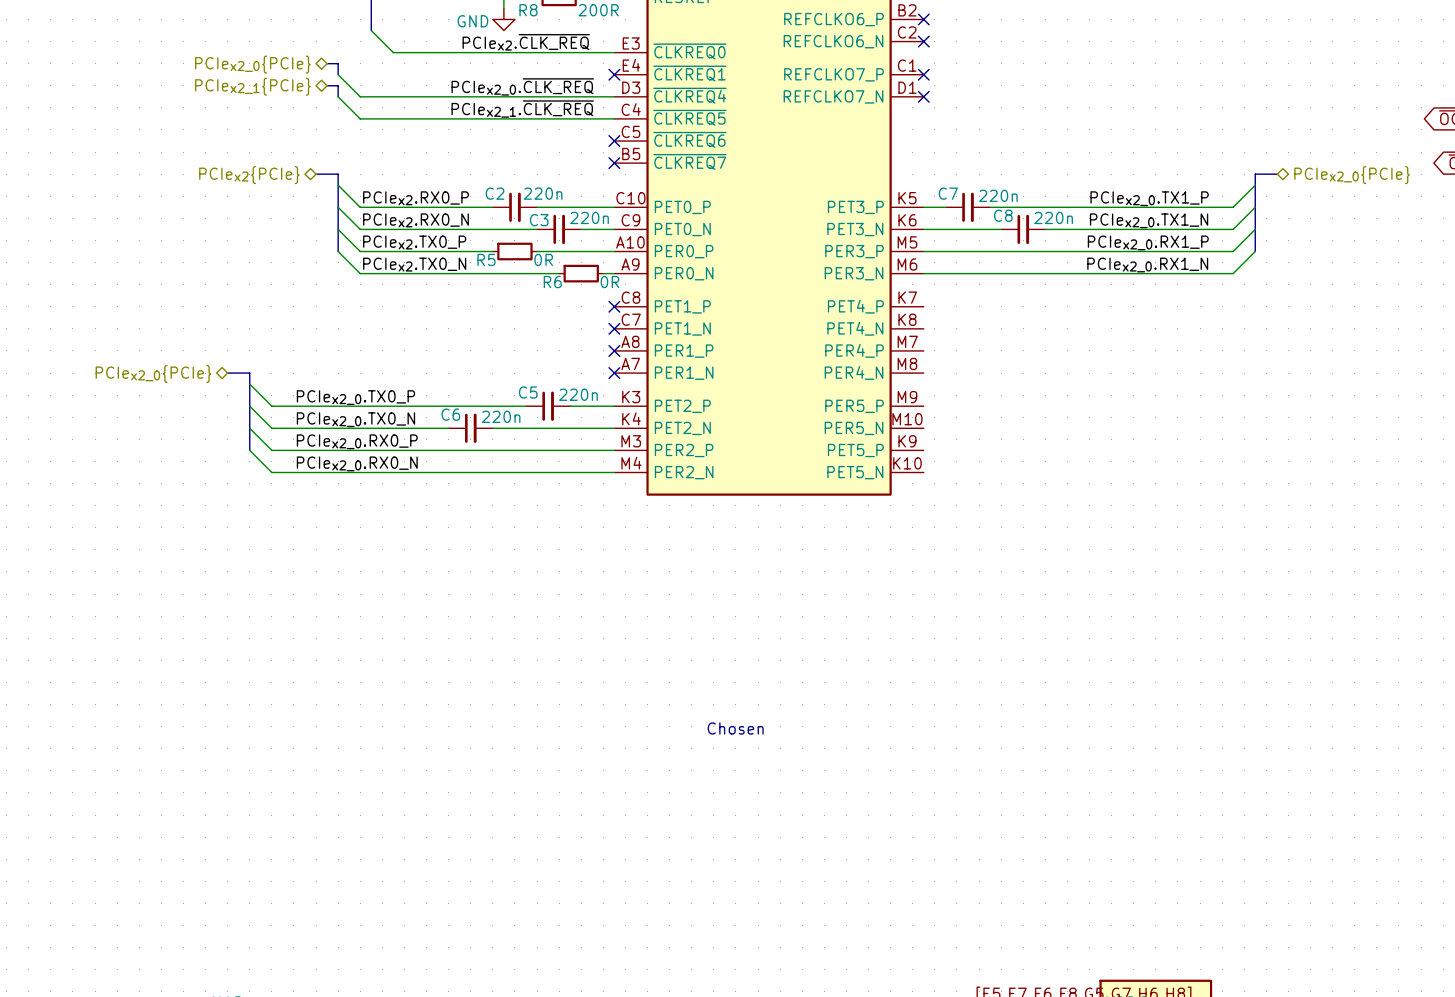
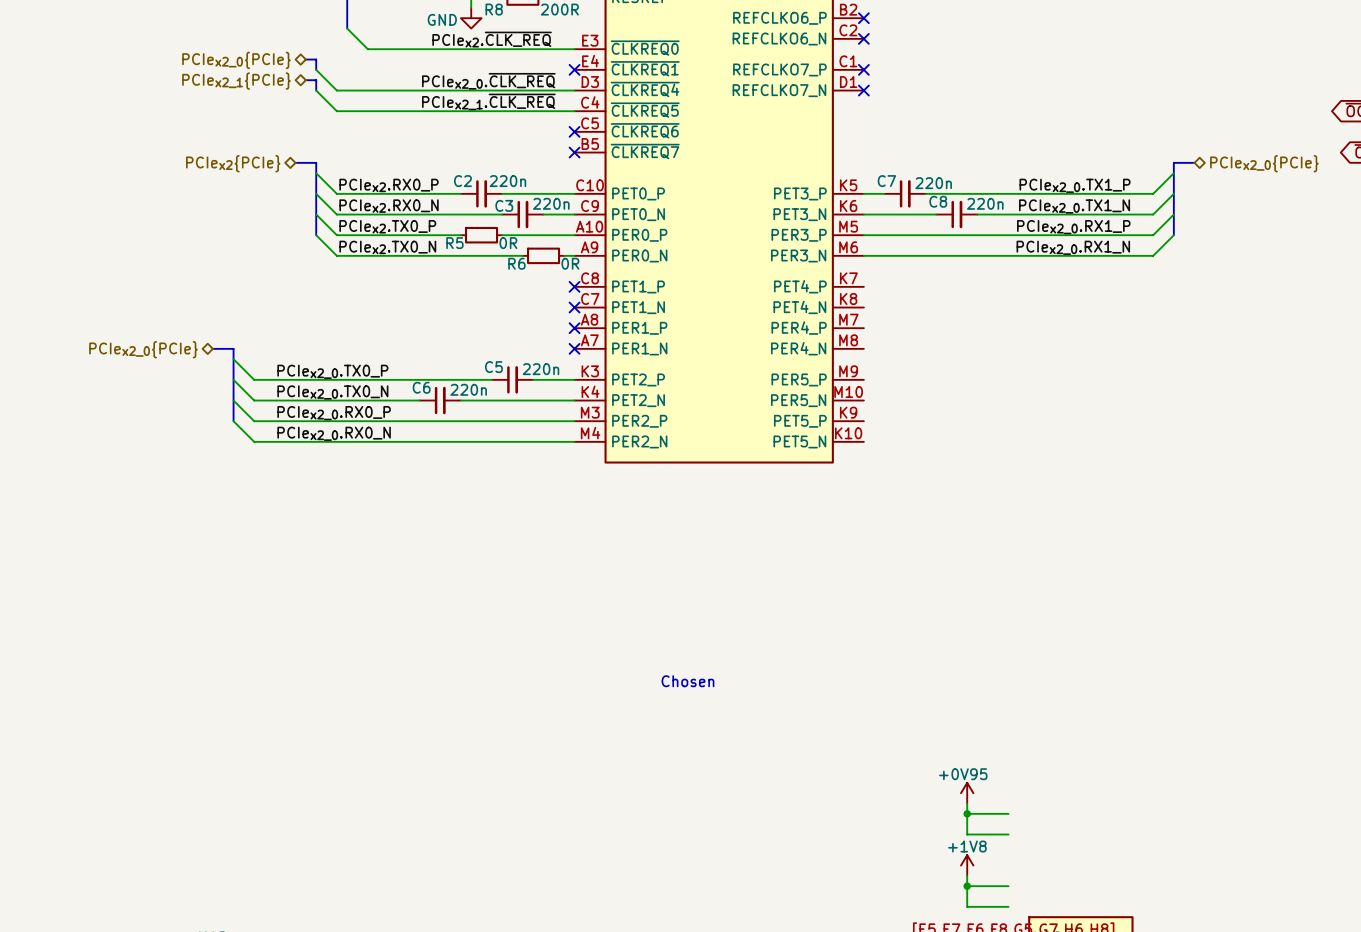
power symbol: none -> +0V95 (967, 793)
wire: none -> (967, 803) (967, 834) (1008, 834)
wire: none -> (967, 813) (1008, 813)
junction: none -> (967, 813)
power symbol: none -> +1V8 (967, 865)
wire: none -> (967, 875) (967, 906) (1008, 906)
wire: none -> (967, 886) (1008, 886)
junction: none -> (967, 886)

